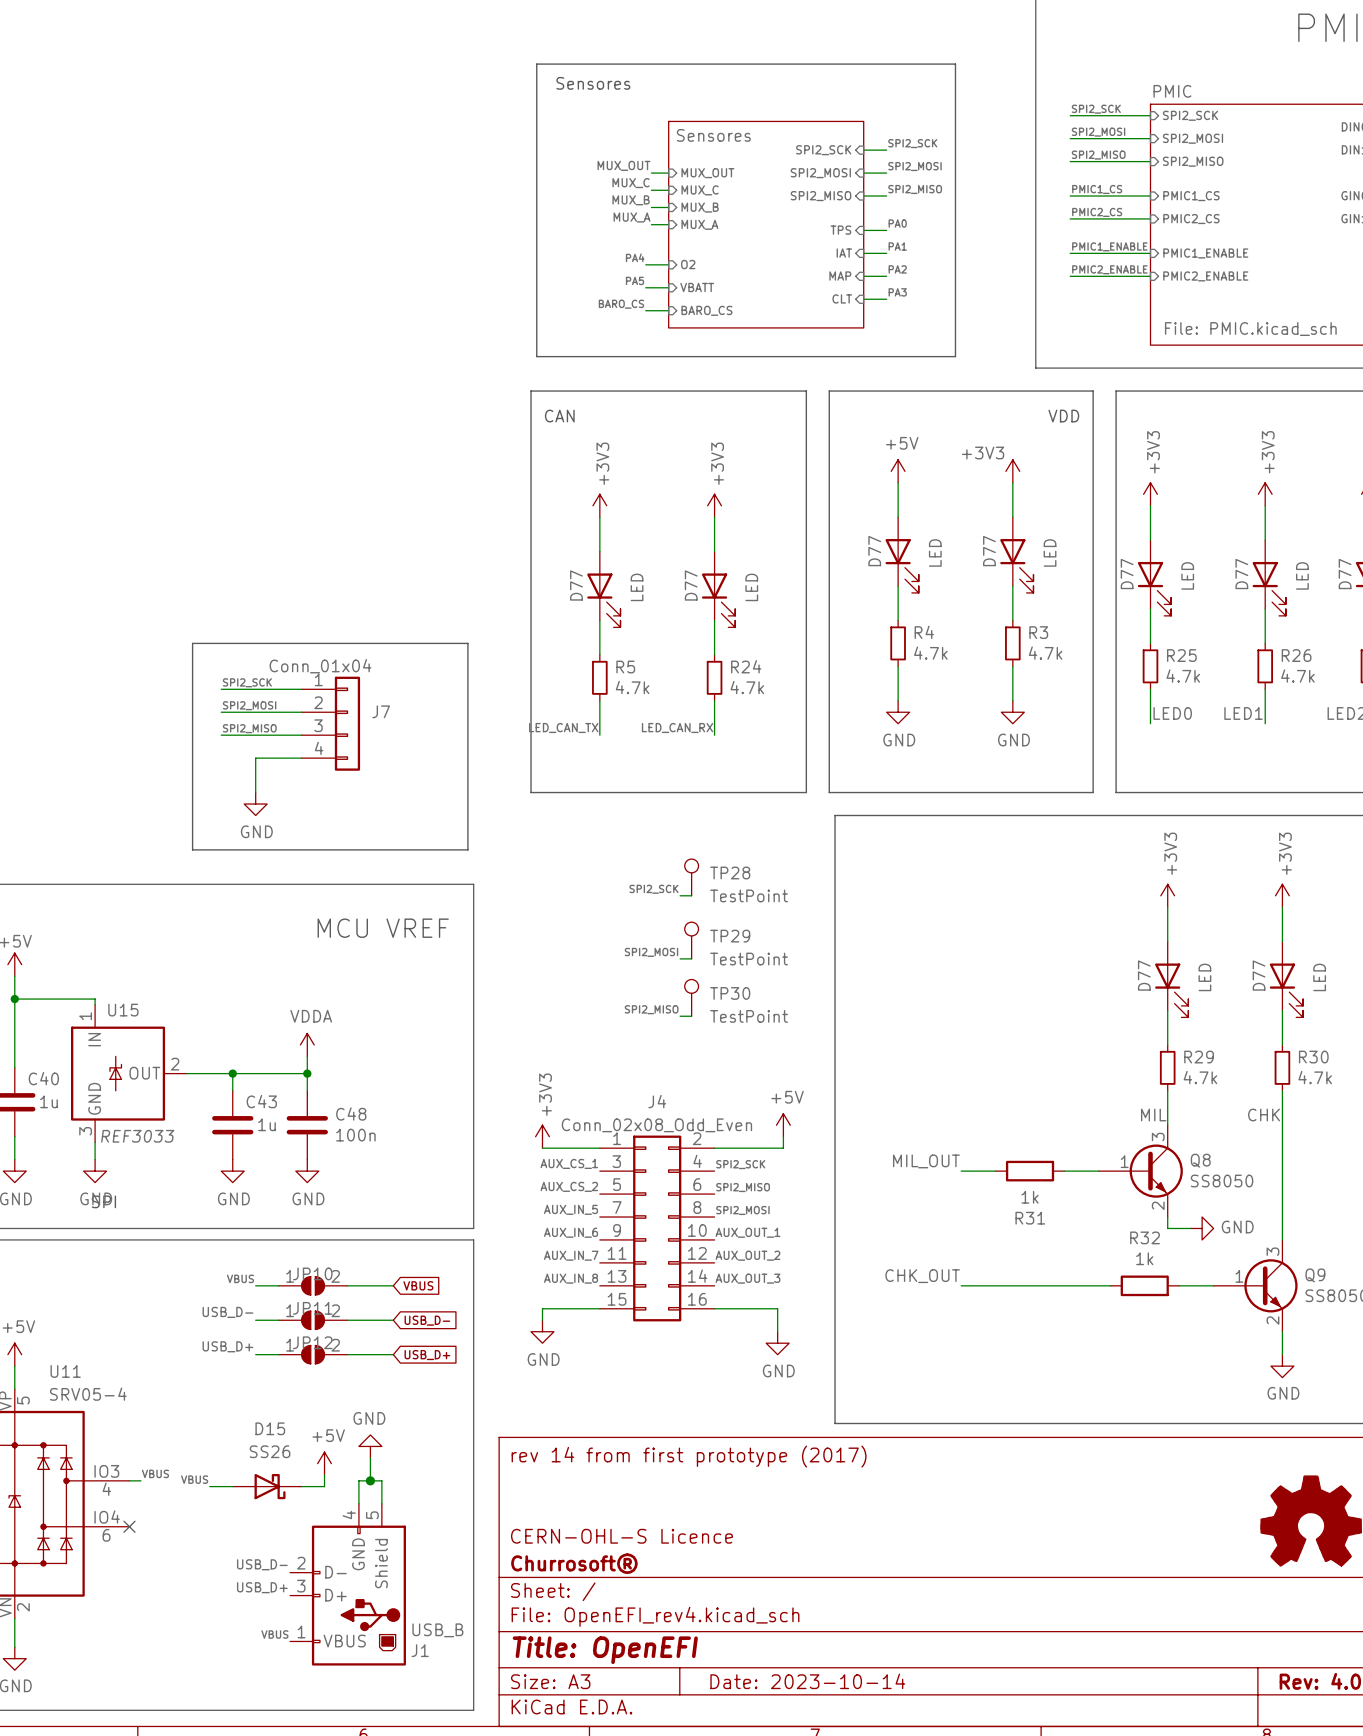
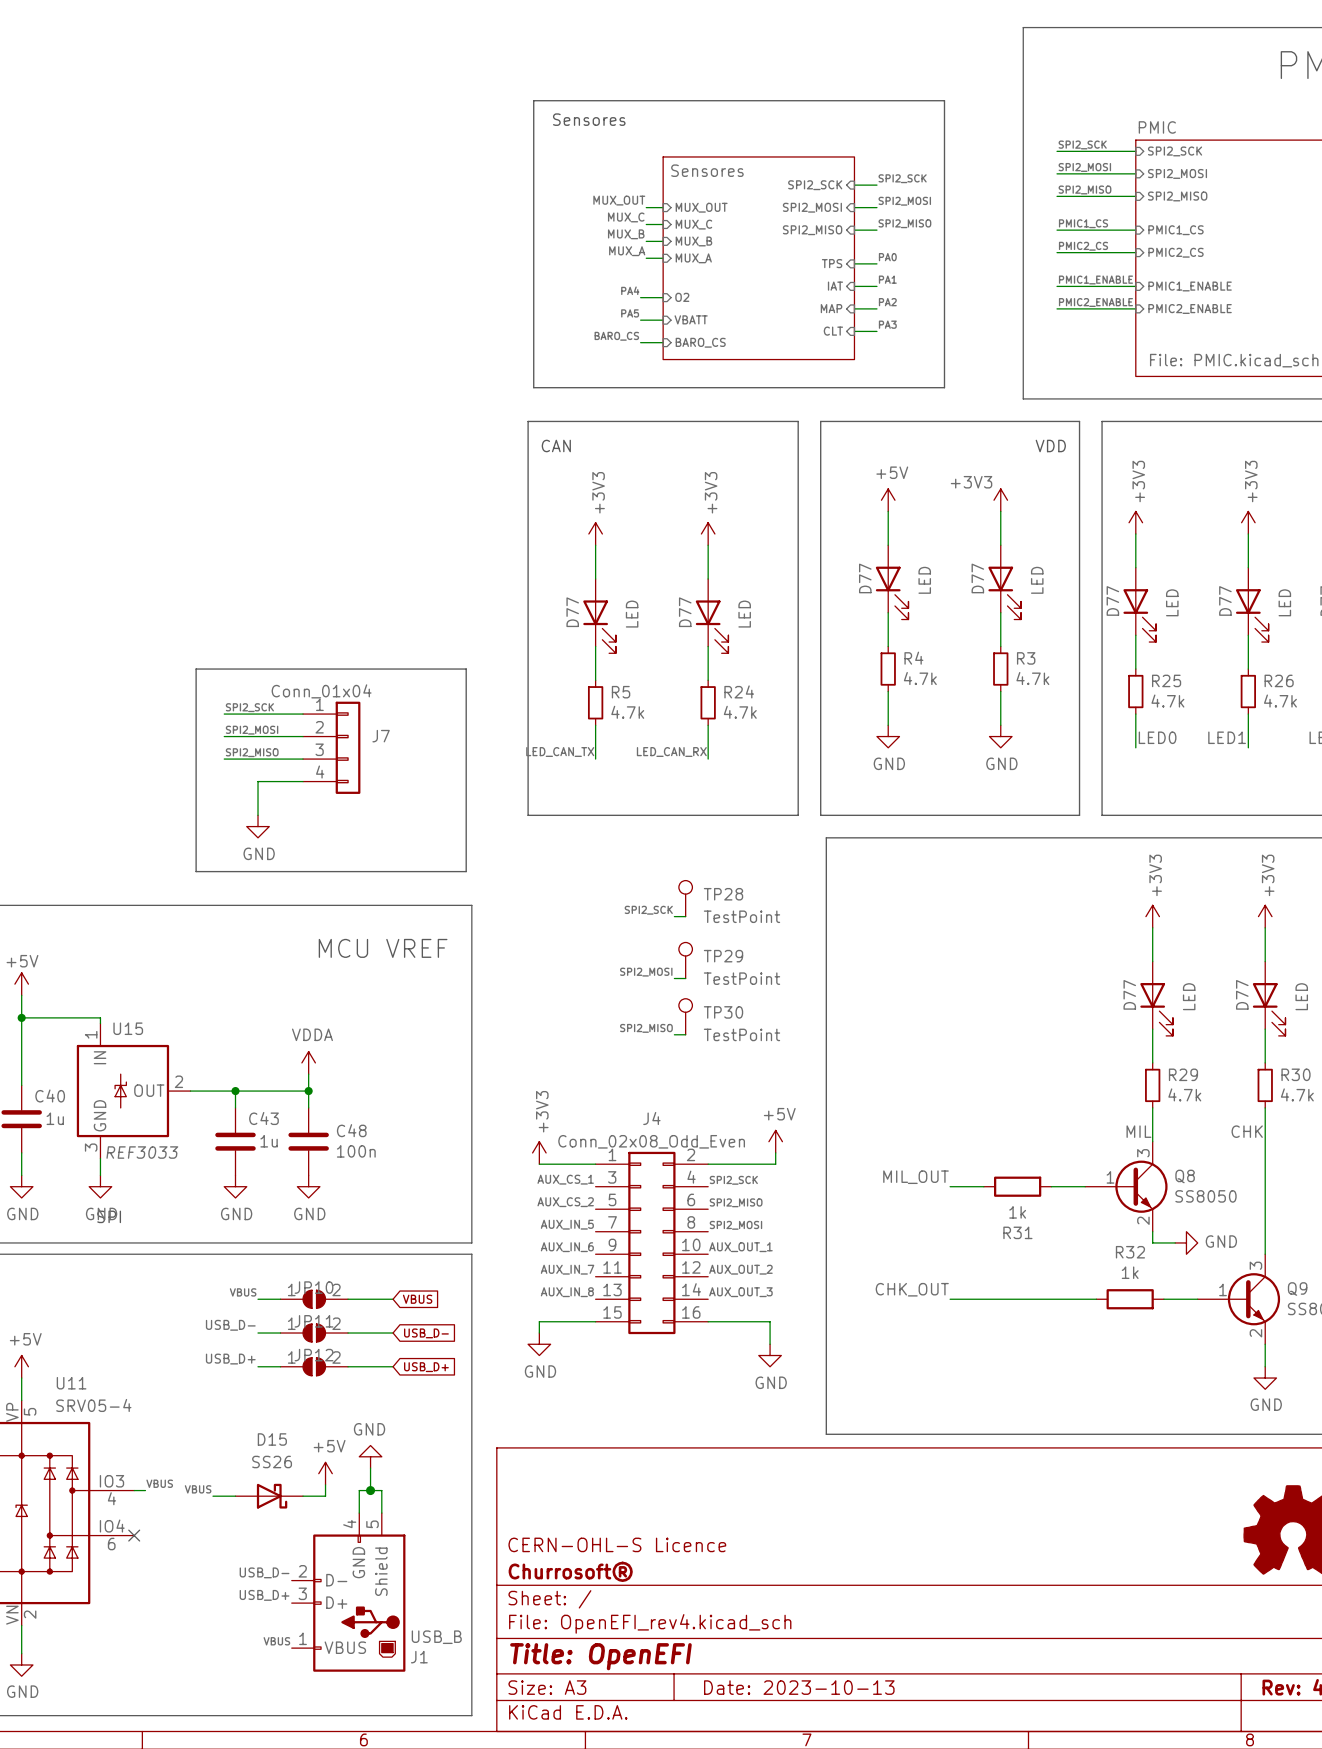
title block: rev 14 from first prototype (2017) (689, 1456) -> none
title block: Date: 2023-10-14 (807, 1681) -> Date: 2023-10-13 (799, 1687)

